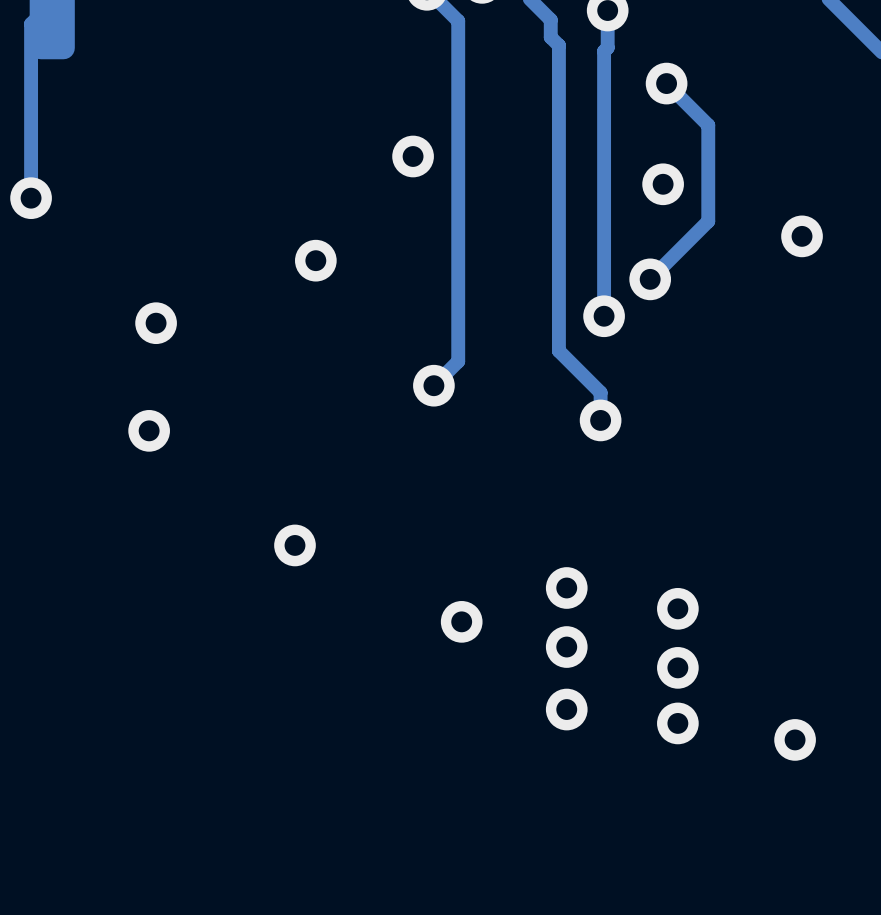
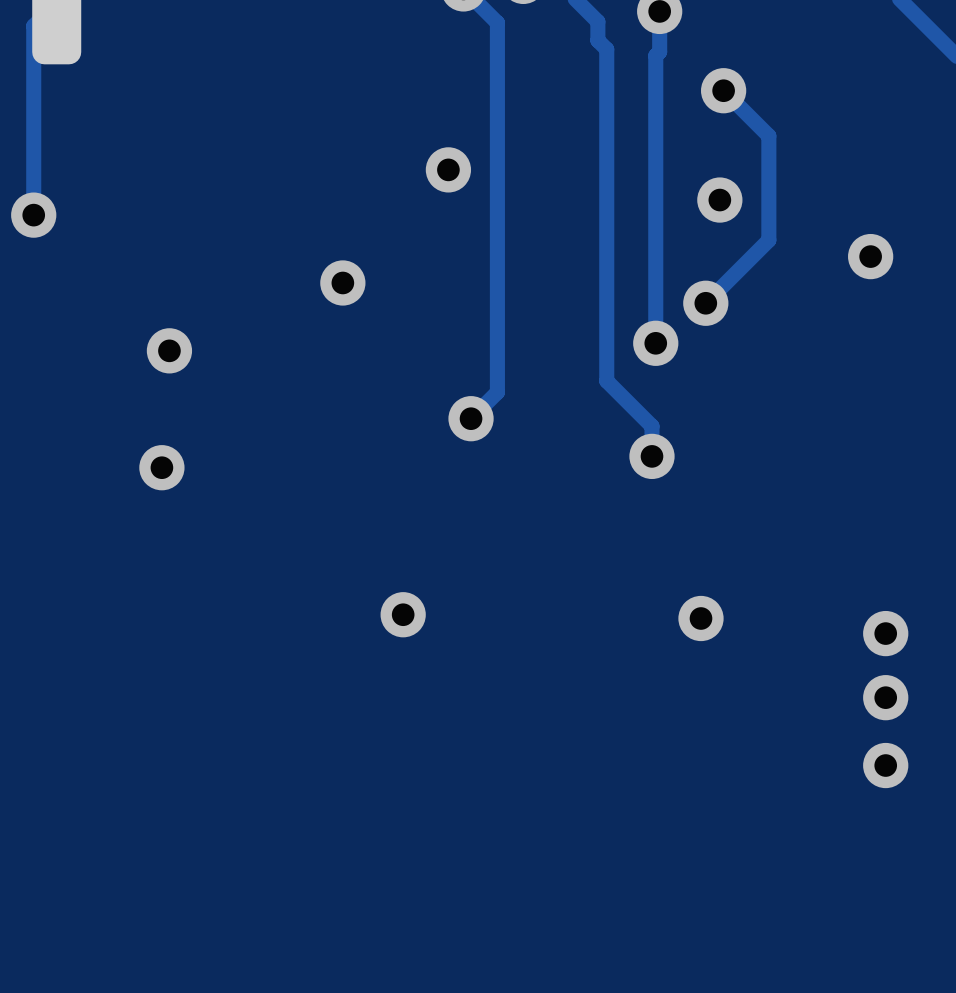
via: (295, 545) -> none
via: none -> (403, 614)
via: none -> (885, 633)
via: (566, 587) -> none
via position: (677, 608) -> (700, 618)
via: (461, 621) -> none
via: none -> (885, 697)
via: (566, 647) -> none
via: (677, 667) -> none
via: (566, 709) -> none
via: (677, 723) -> none
via position: (795, 739) -> (885, 765)

